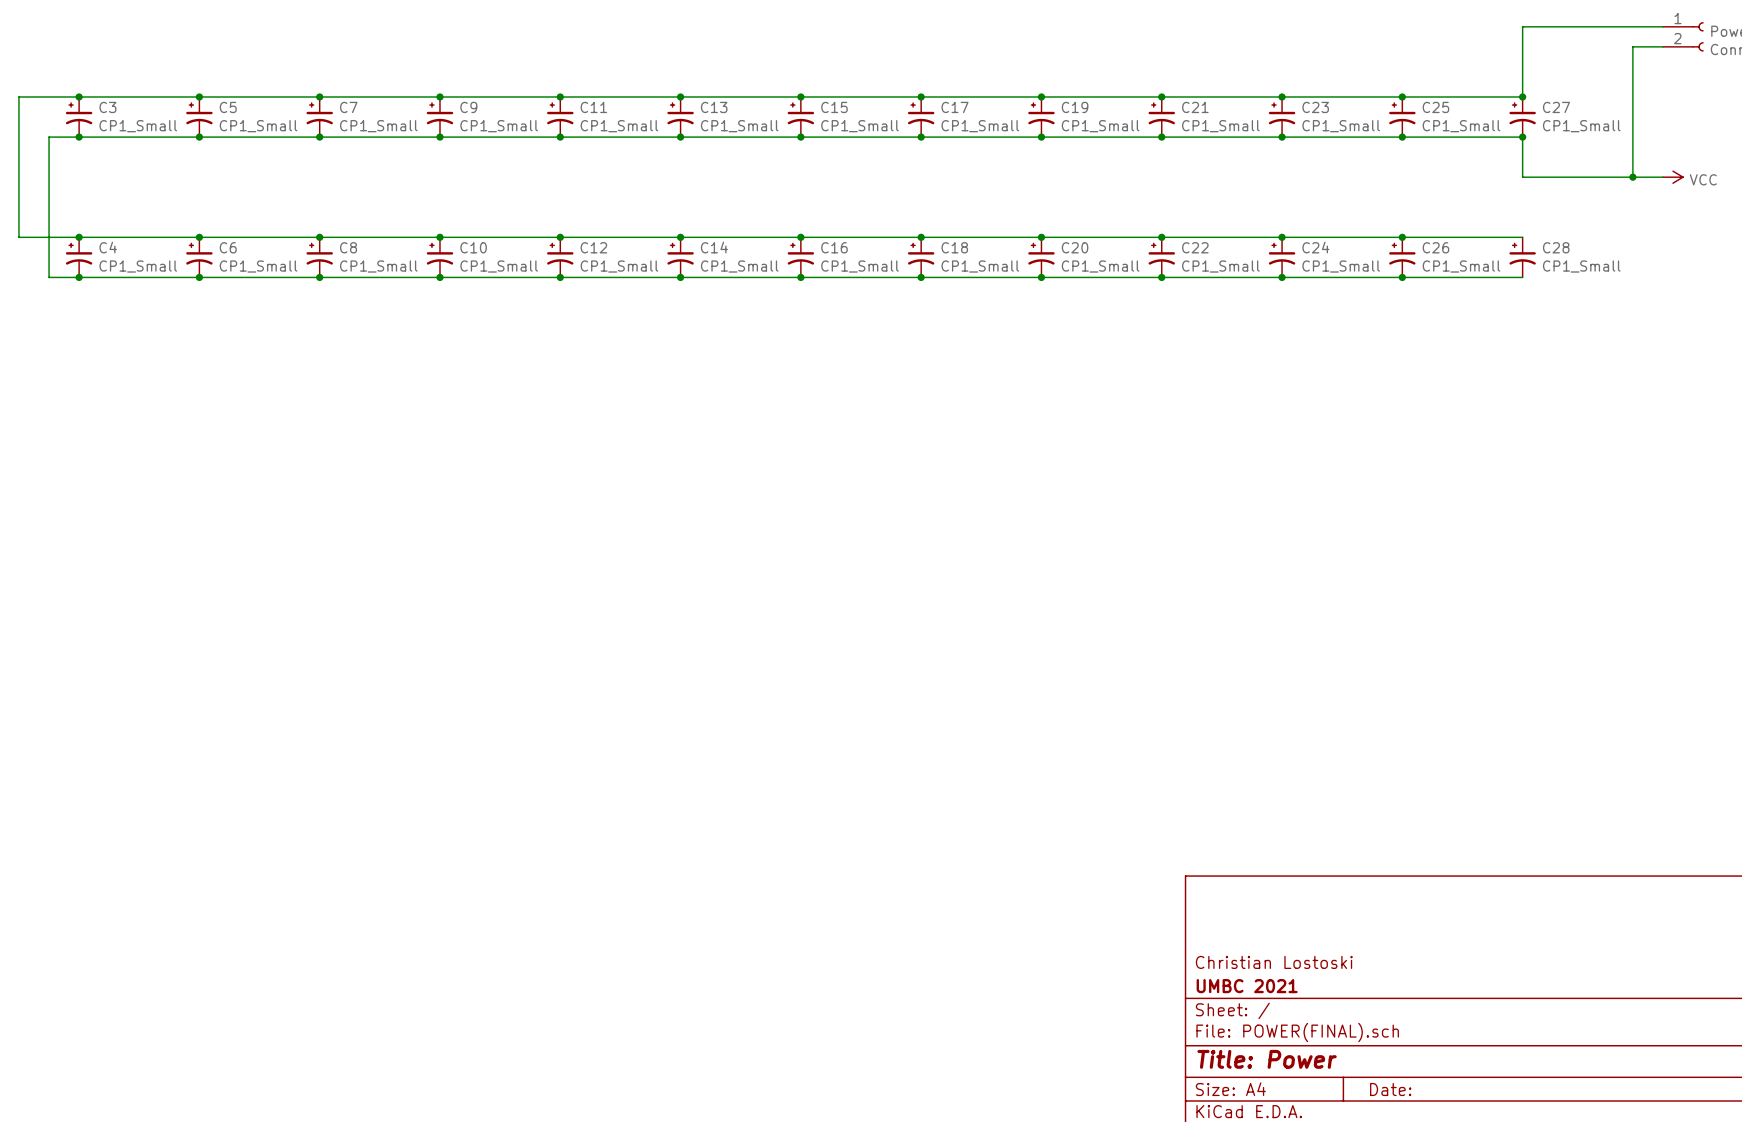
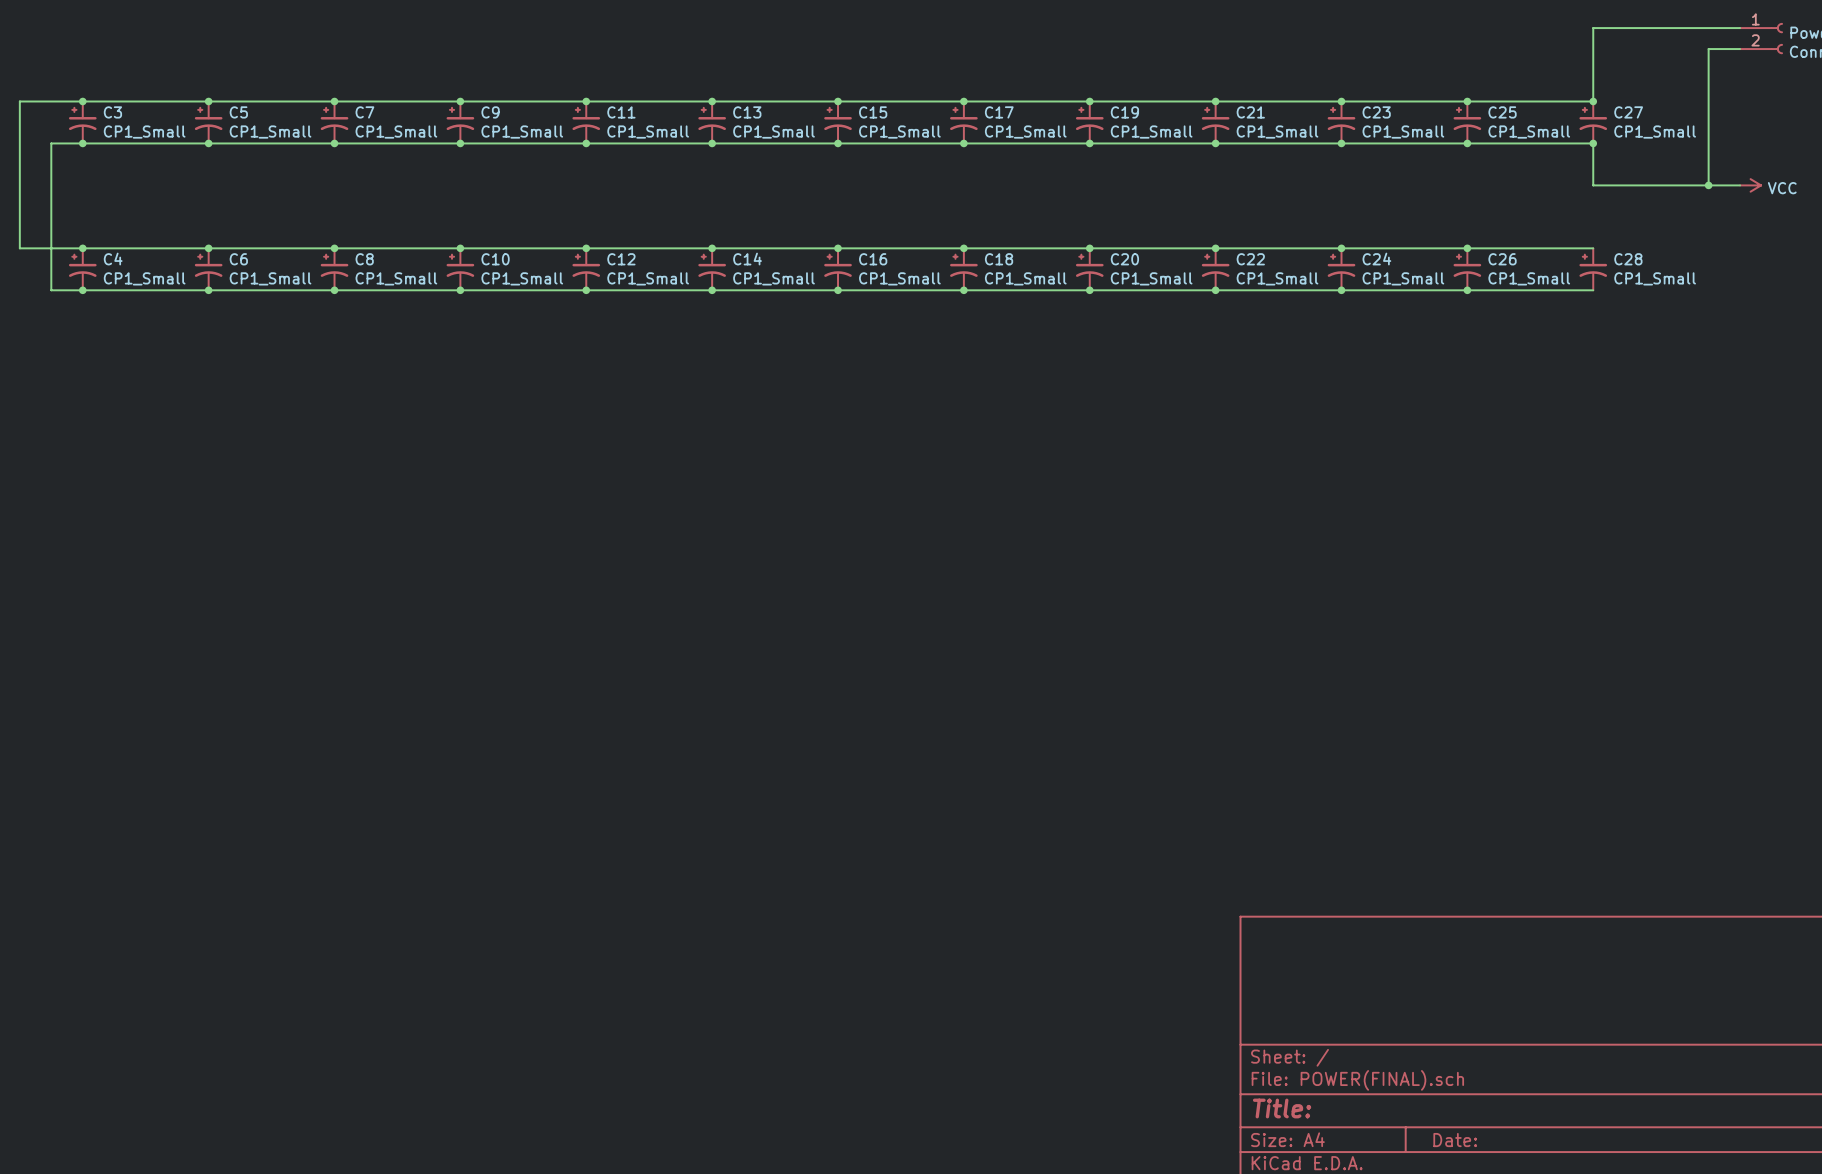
title block: Christian Lostoski (1274, 962) -> none
title block: UMBC 2021 (1247, 986) -> none
title block: Title: Power (1267, 1059) -> Title: (1282, 1108)

